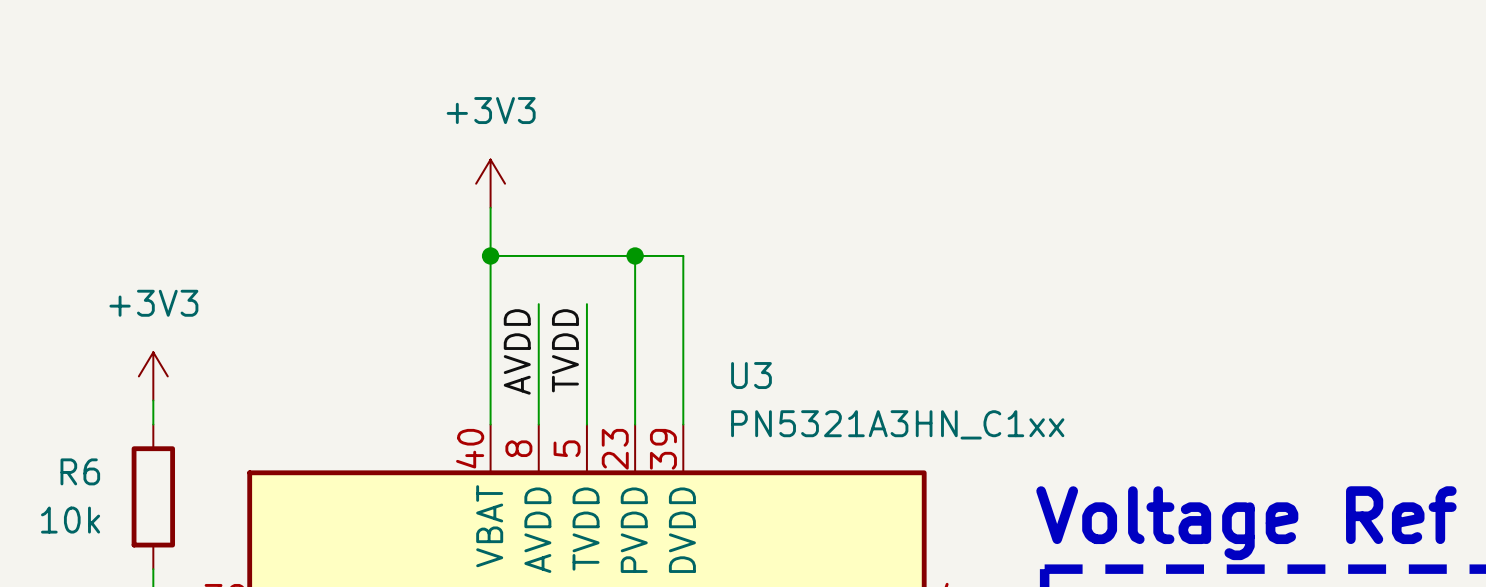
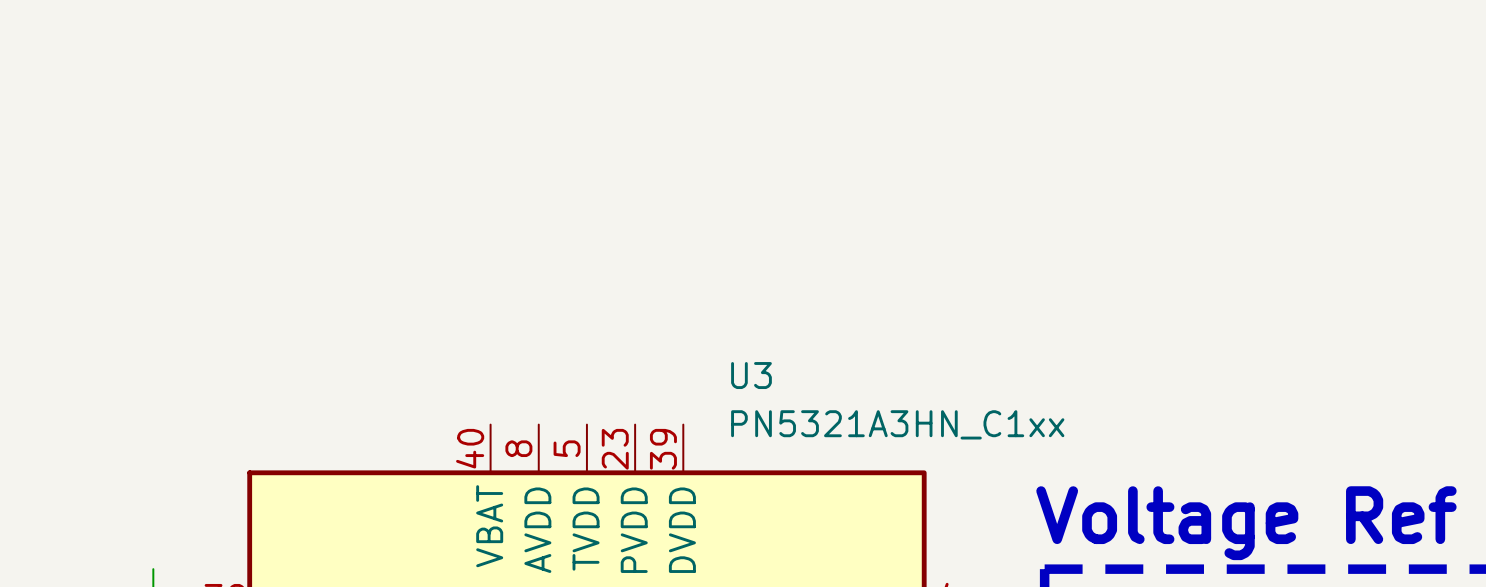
power symbol: +3V3 (490, 183) -> none
wire: (490, 207) (490, 424) -> none
wire: (490, 255) (683, 255) (683, 424) -> none
junction: (490, 255) -> none
wire: (635, 255) (635, 424) -> none
junction: (635, 255) -> none
wire: (538, 304) (538, 424) -> none
wire: (586, 304) (586, 424) -> none
label: TVDD (565, 350) -> none
label: AVDD (517, 351) -> none
power symbol: +3V3 (153, 376) -> none
wire: (153, 400) (153, 424) -> none
R6: 10k (153, 496) -> none

